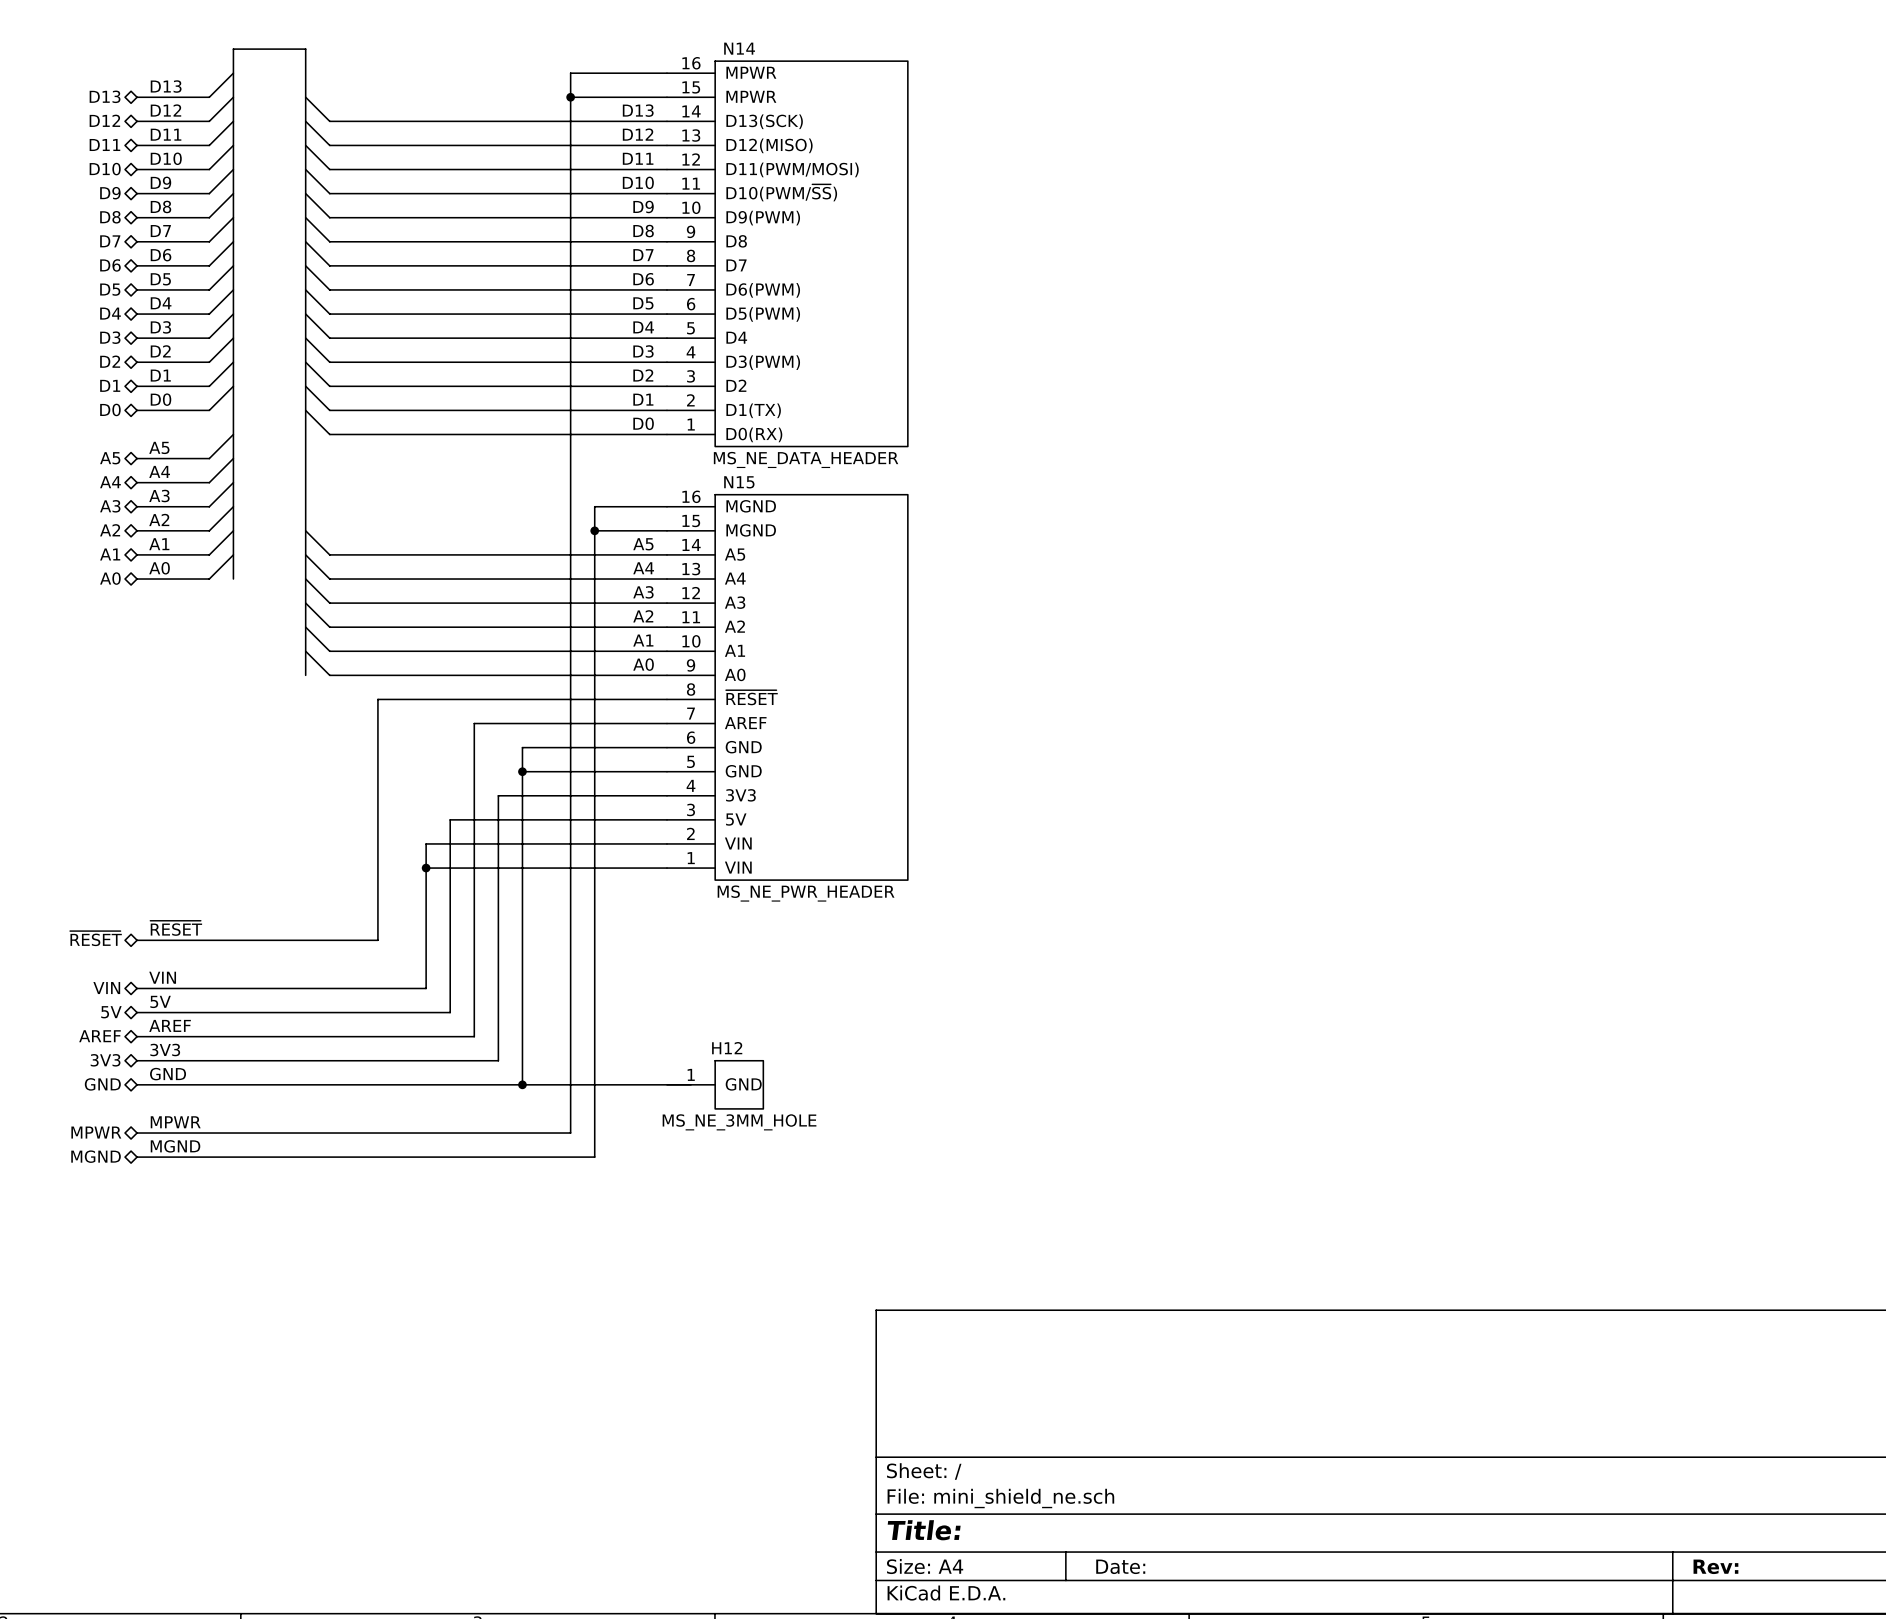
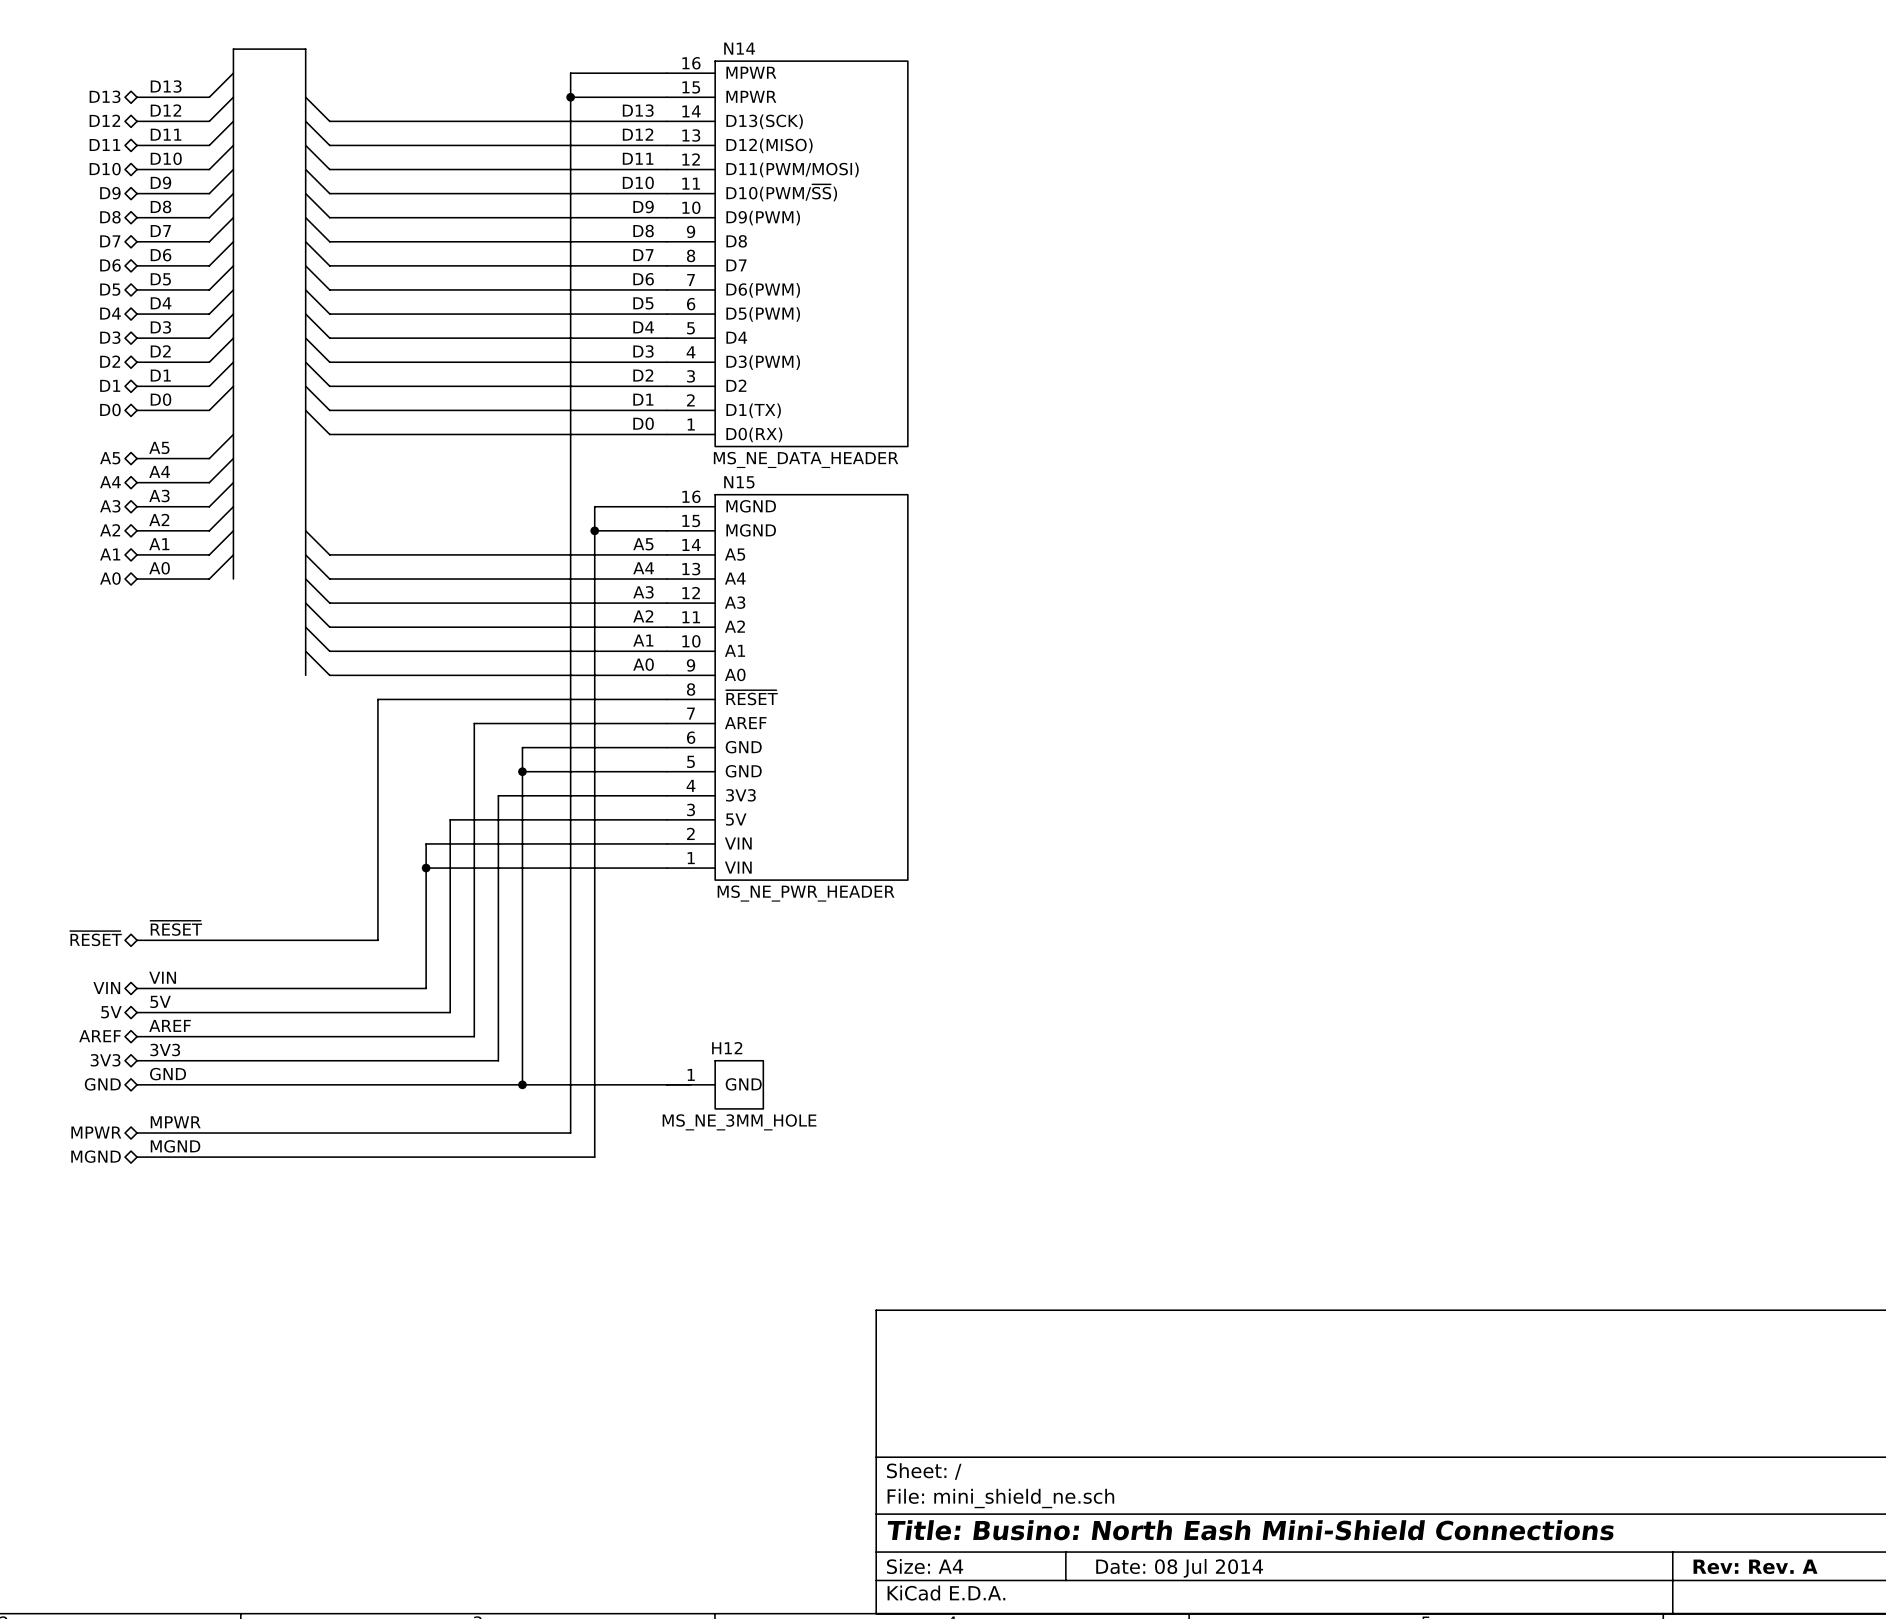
title block: Title: (924, 1530) -> Title: Busino: North Eash Mini-Shield Connections (1250, 1530)
title block: Date: (1120, 1566) -> Date: 08 Jul 2014 (1179, 1568)
title block: Rev: (1715, 1566) -> Rev: Rev. A (1755, 1566)

